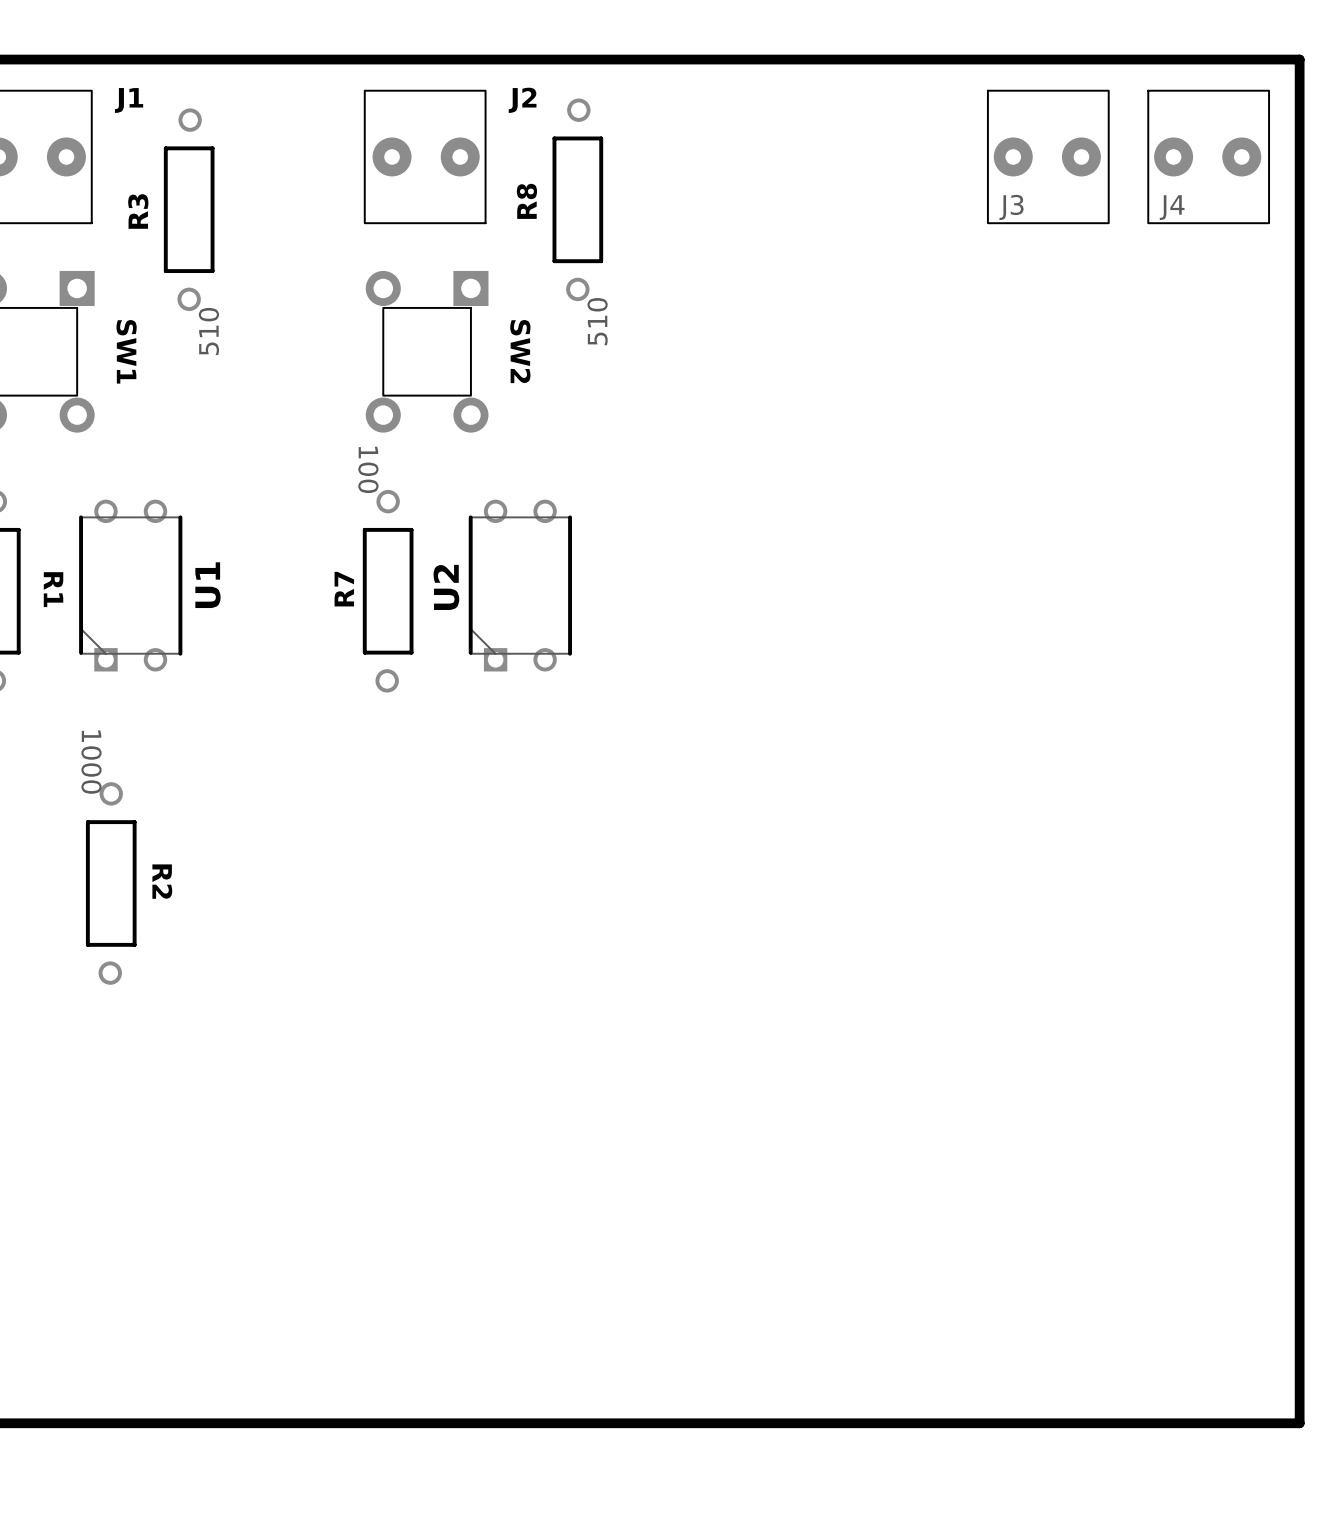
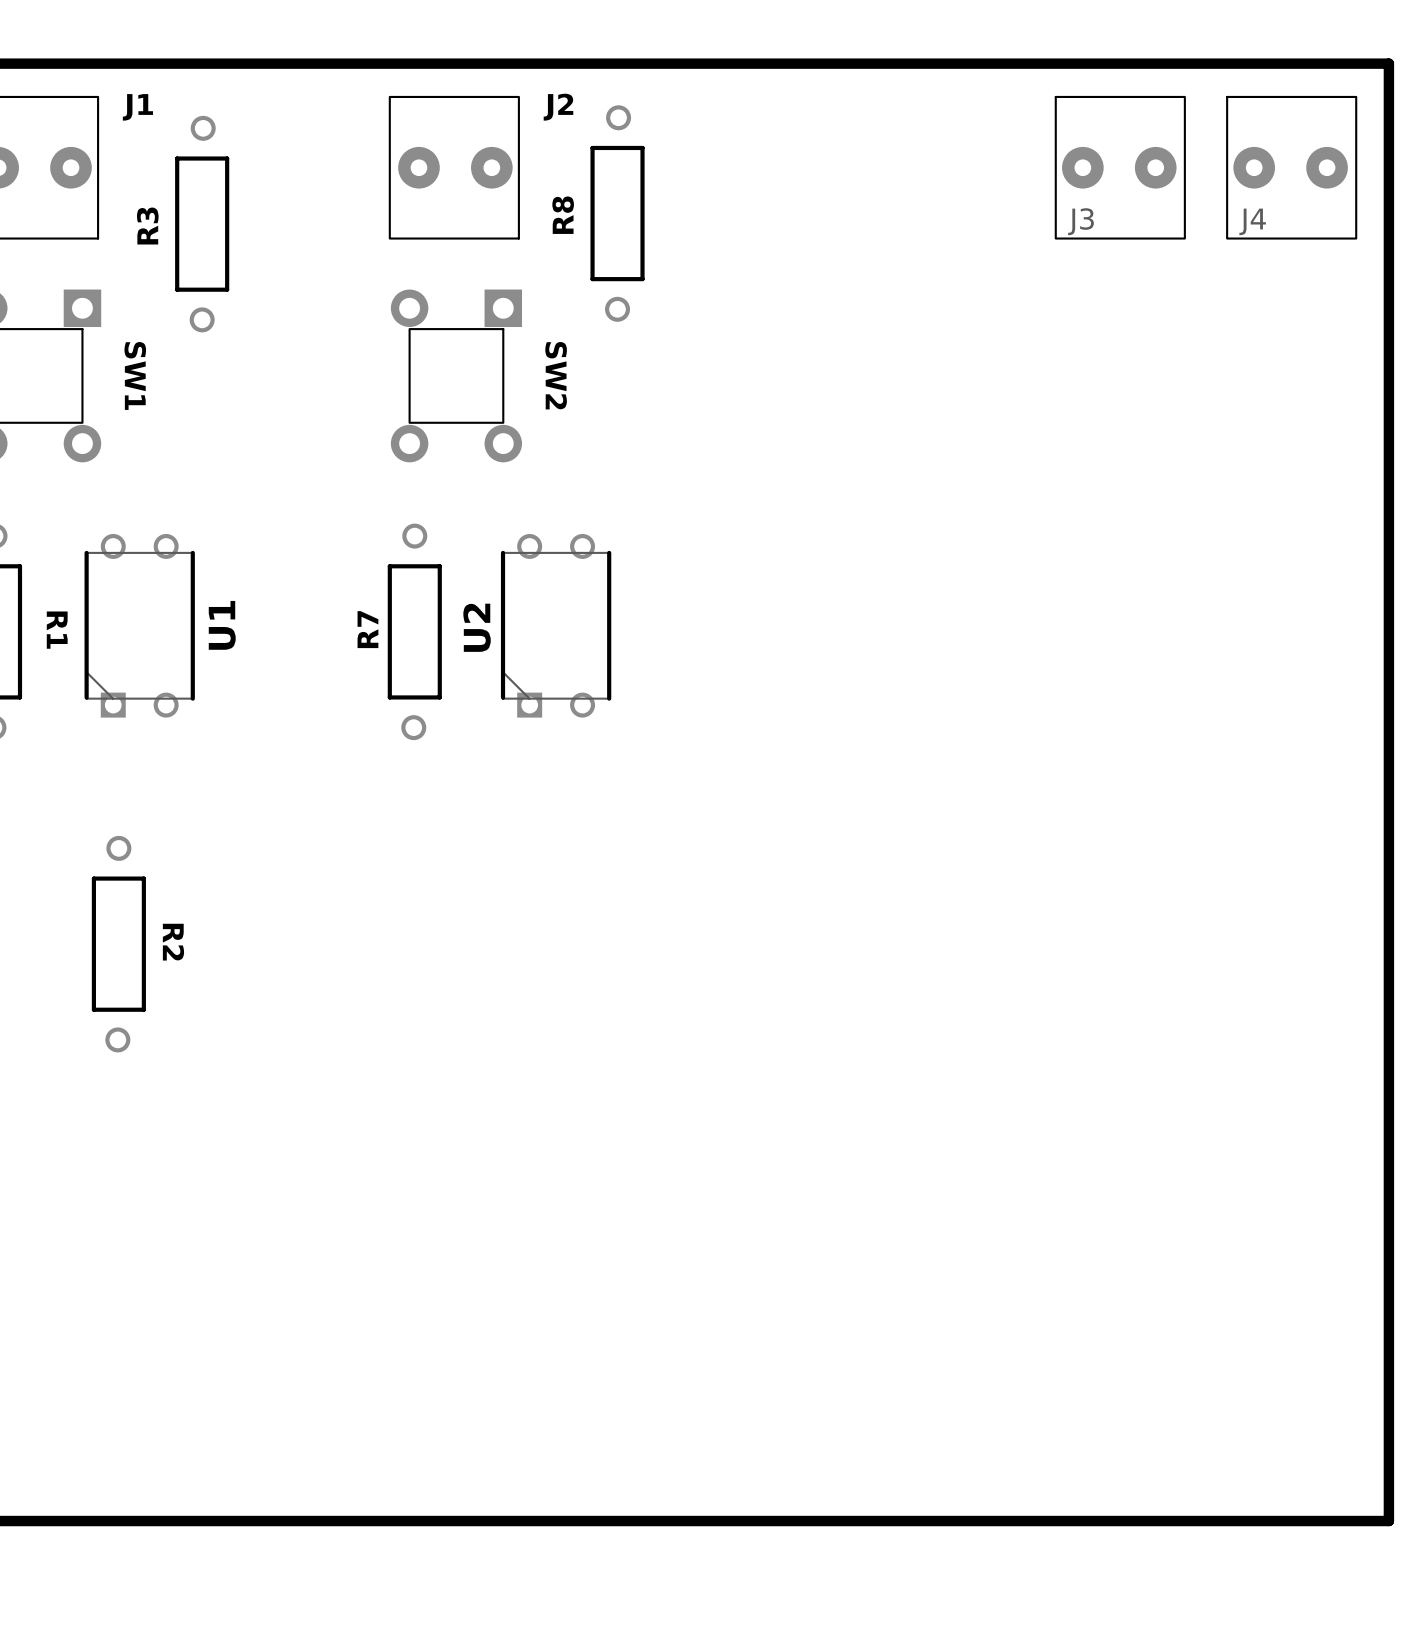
R8 value: 510 (597, 321) -> none
R3 value: 510 (208, 331) -> none
R7 value: 100 (368, 469) -> none
R2 value: 1000 (91, 762) -> none

